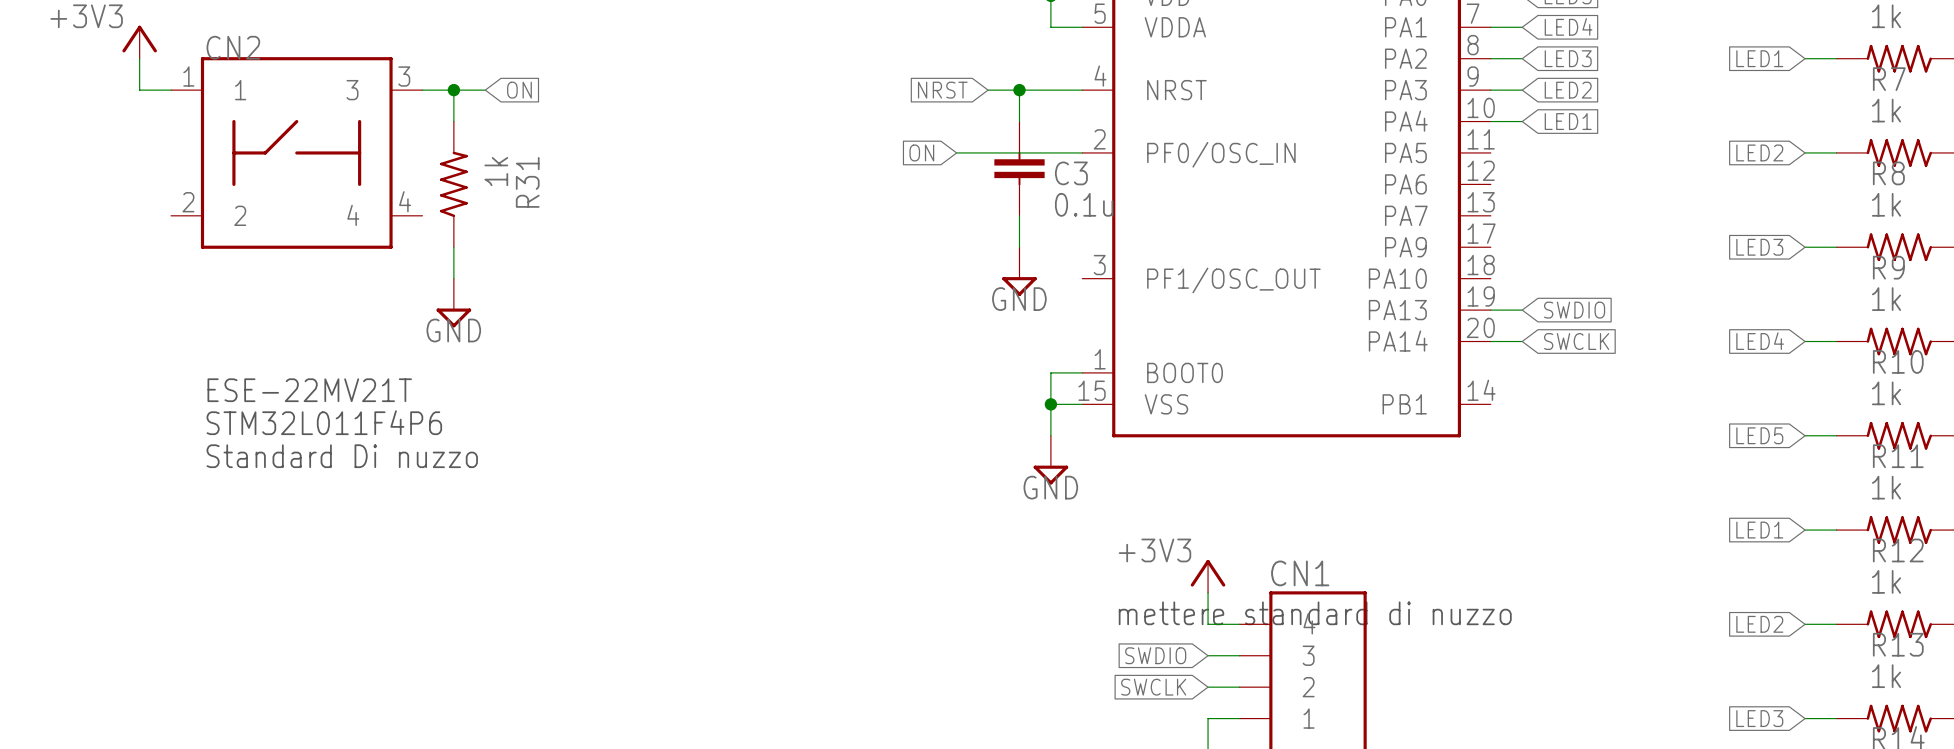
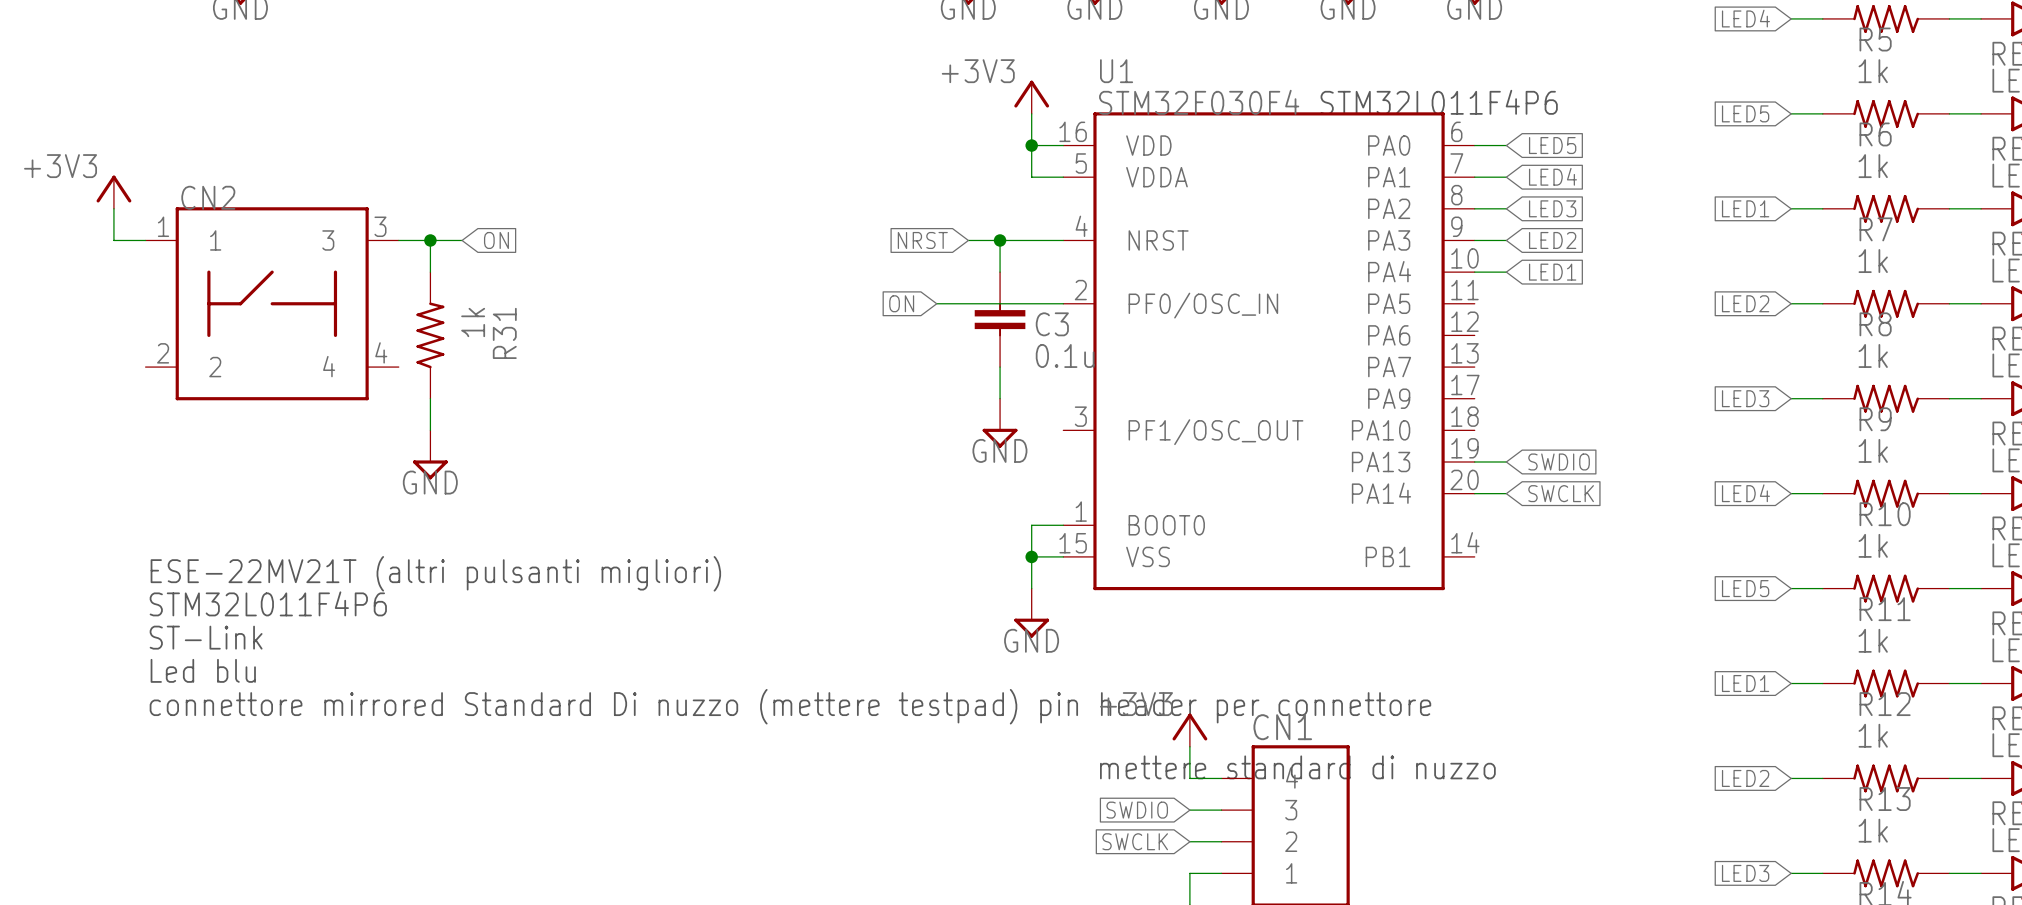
text: ESE-22MV21T (309, 390) -> none
text: none -> ESE-22MV21T (altri pulsanti migliori) (435, 573)
text position: STM32L011F4P6 (324, 422) -> STM32L011F4P6 (268, 603)
text: Standard Di nuzzo (342, 456) -> none
text: none -> ST-Link (206, 637)
text: none -> Led blu (203, 670)
text: none -> connettore mirrored Standard Di nuzzo (mettere testpad) pin header per connettore (790, 706)

